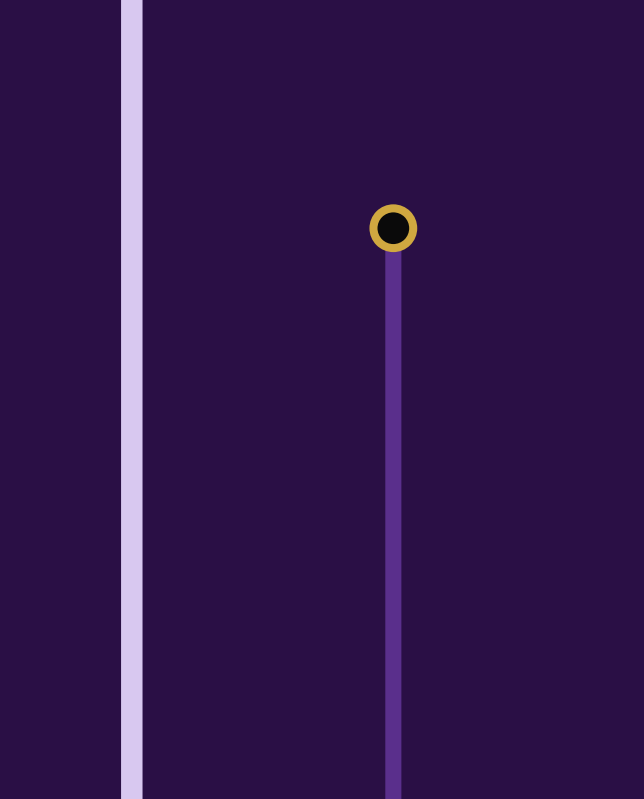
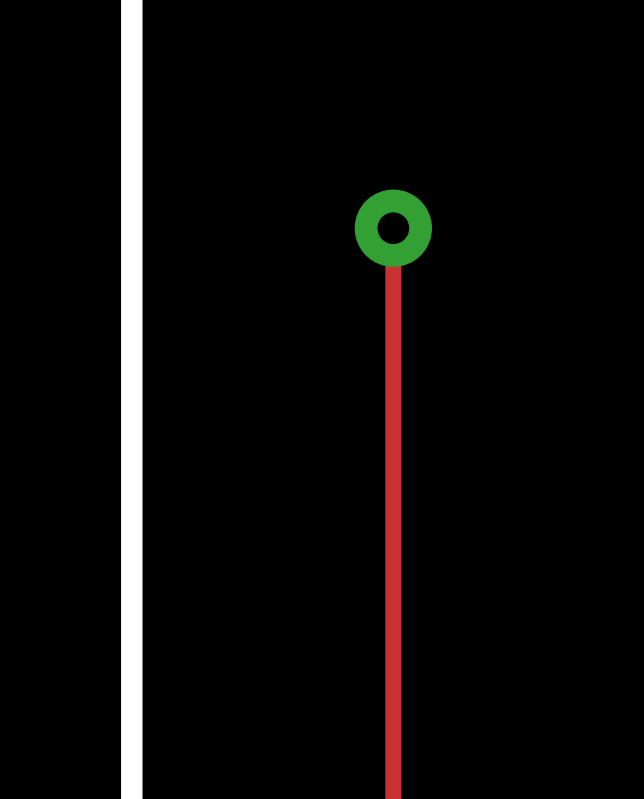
via size: [369, 204, 418, 253] -> [354, 189, 432, 267]

